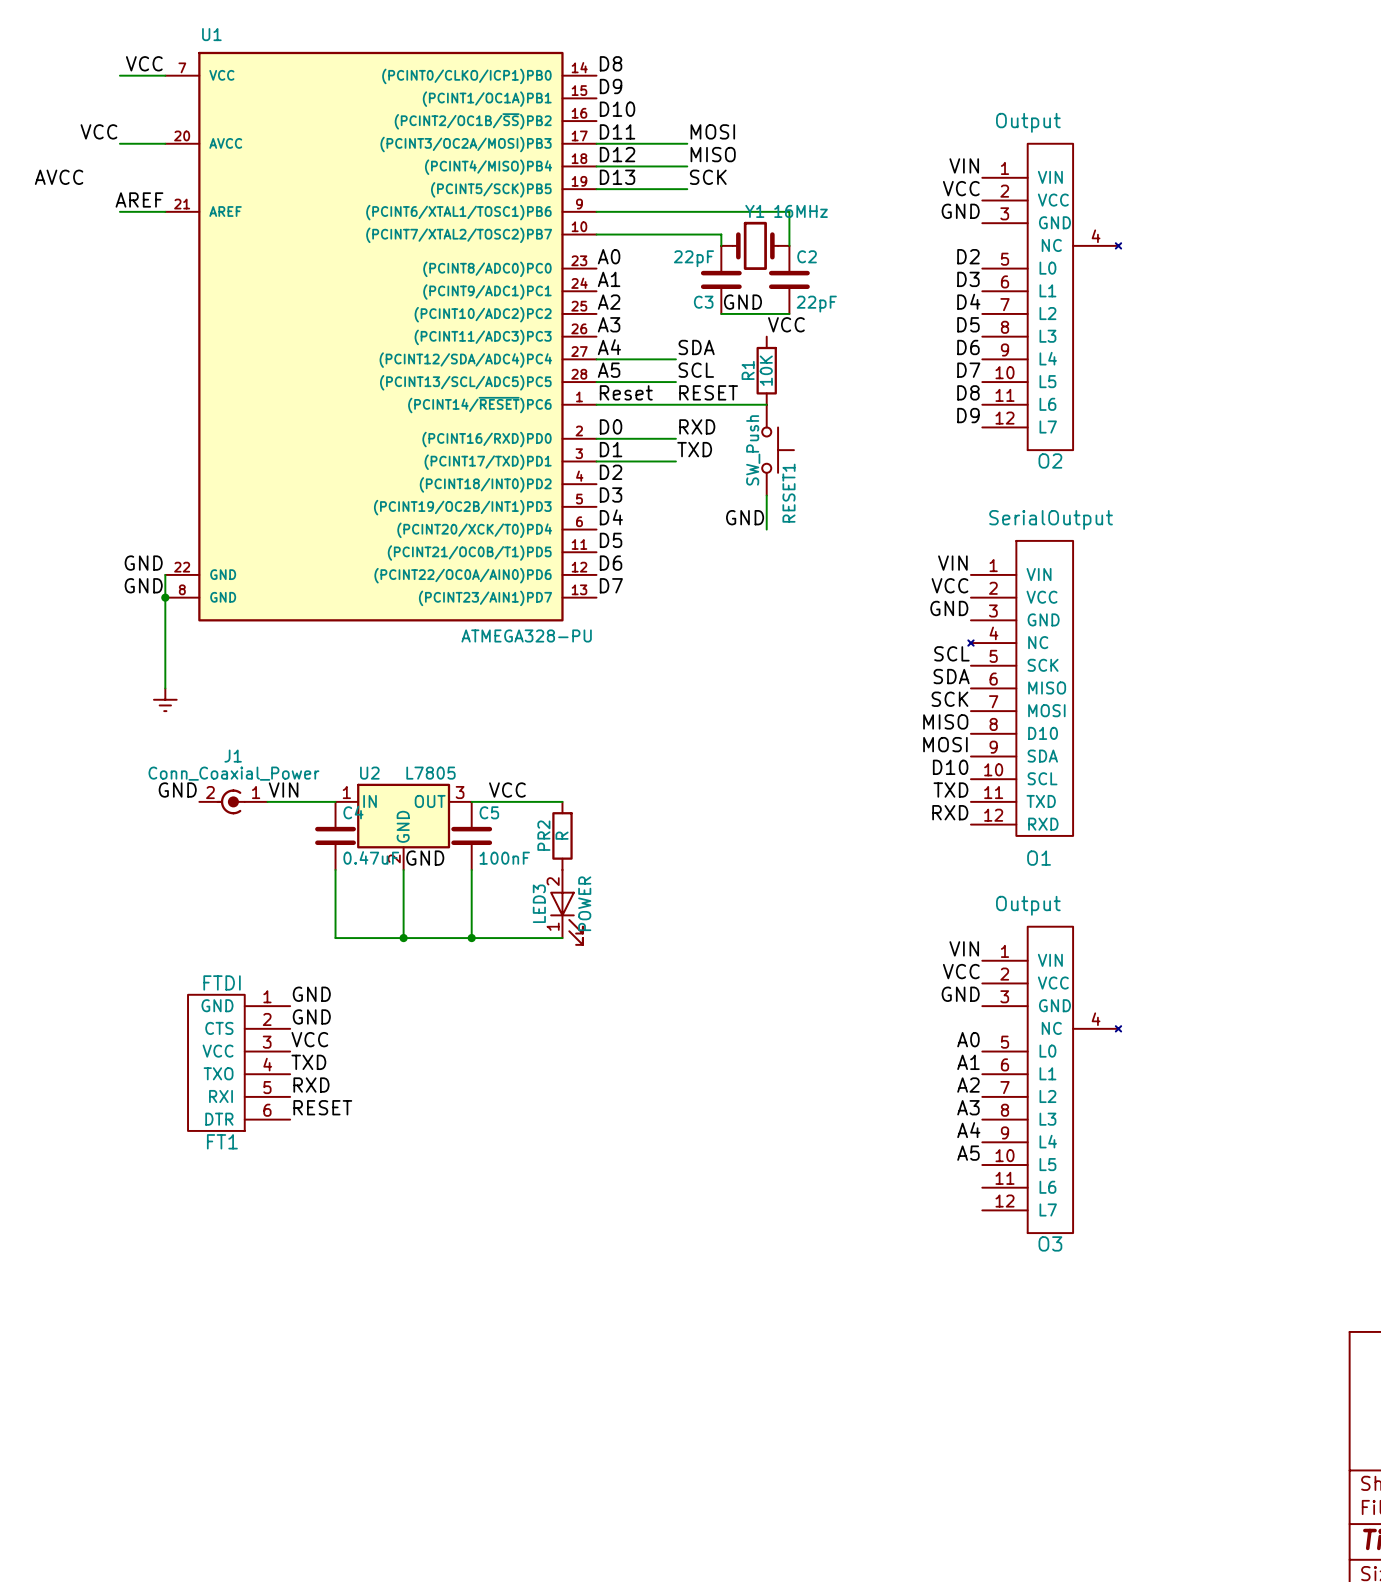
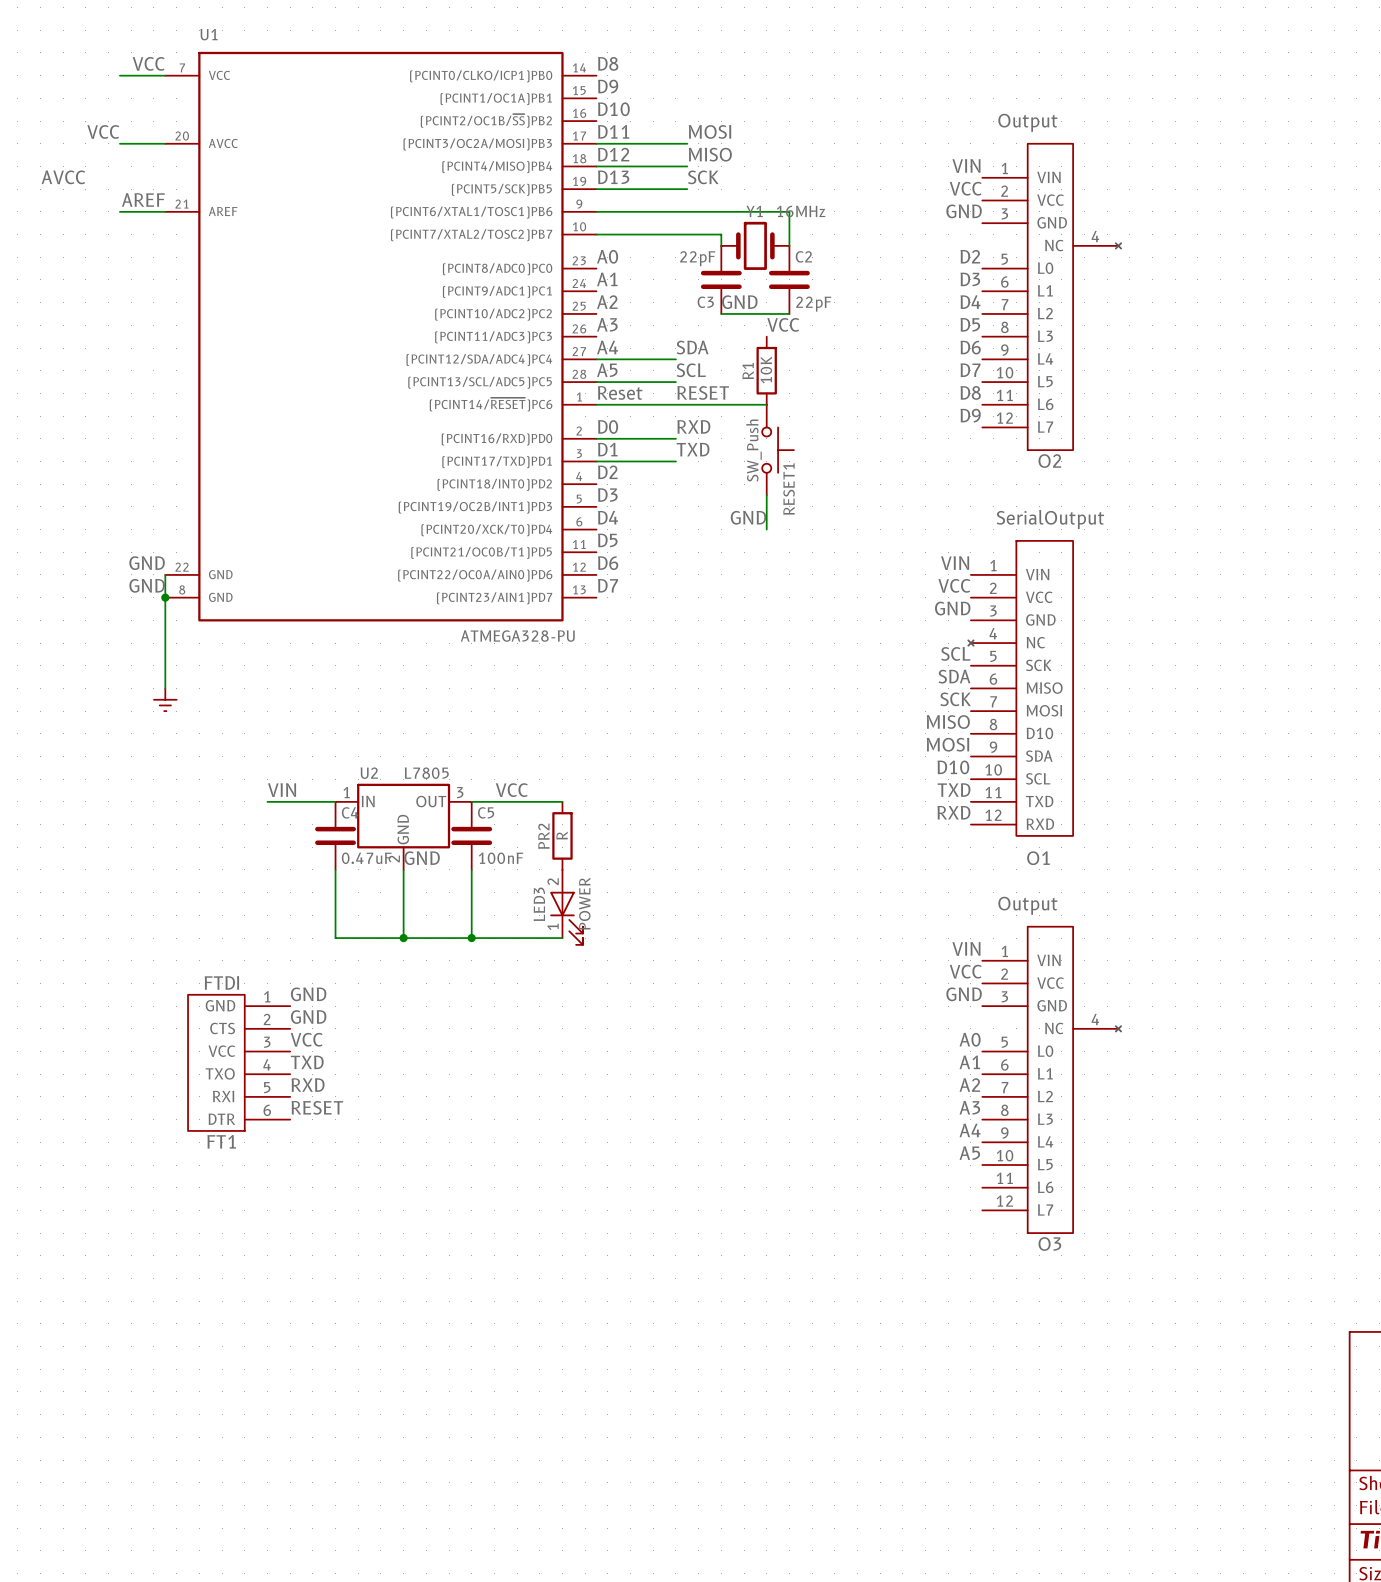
label: GND (177, 790) -> none
J1: Conn_Coaxial_Power (233, 801) -> none

